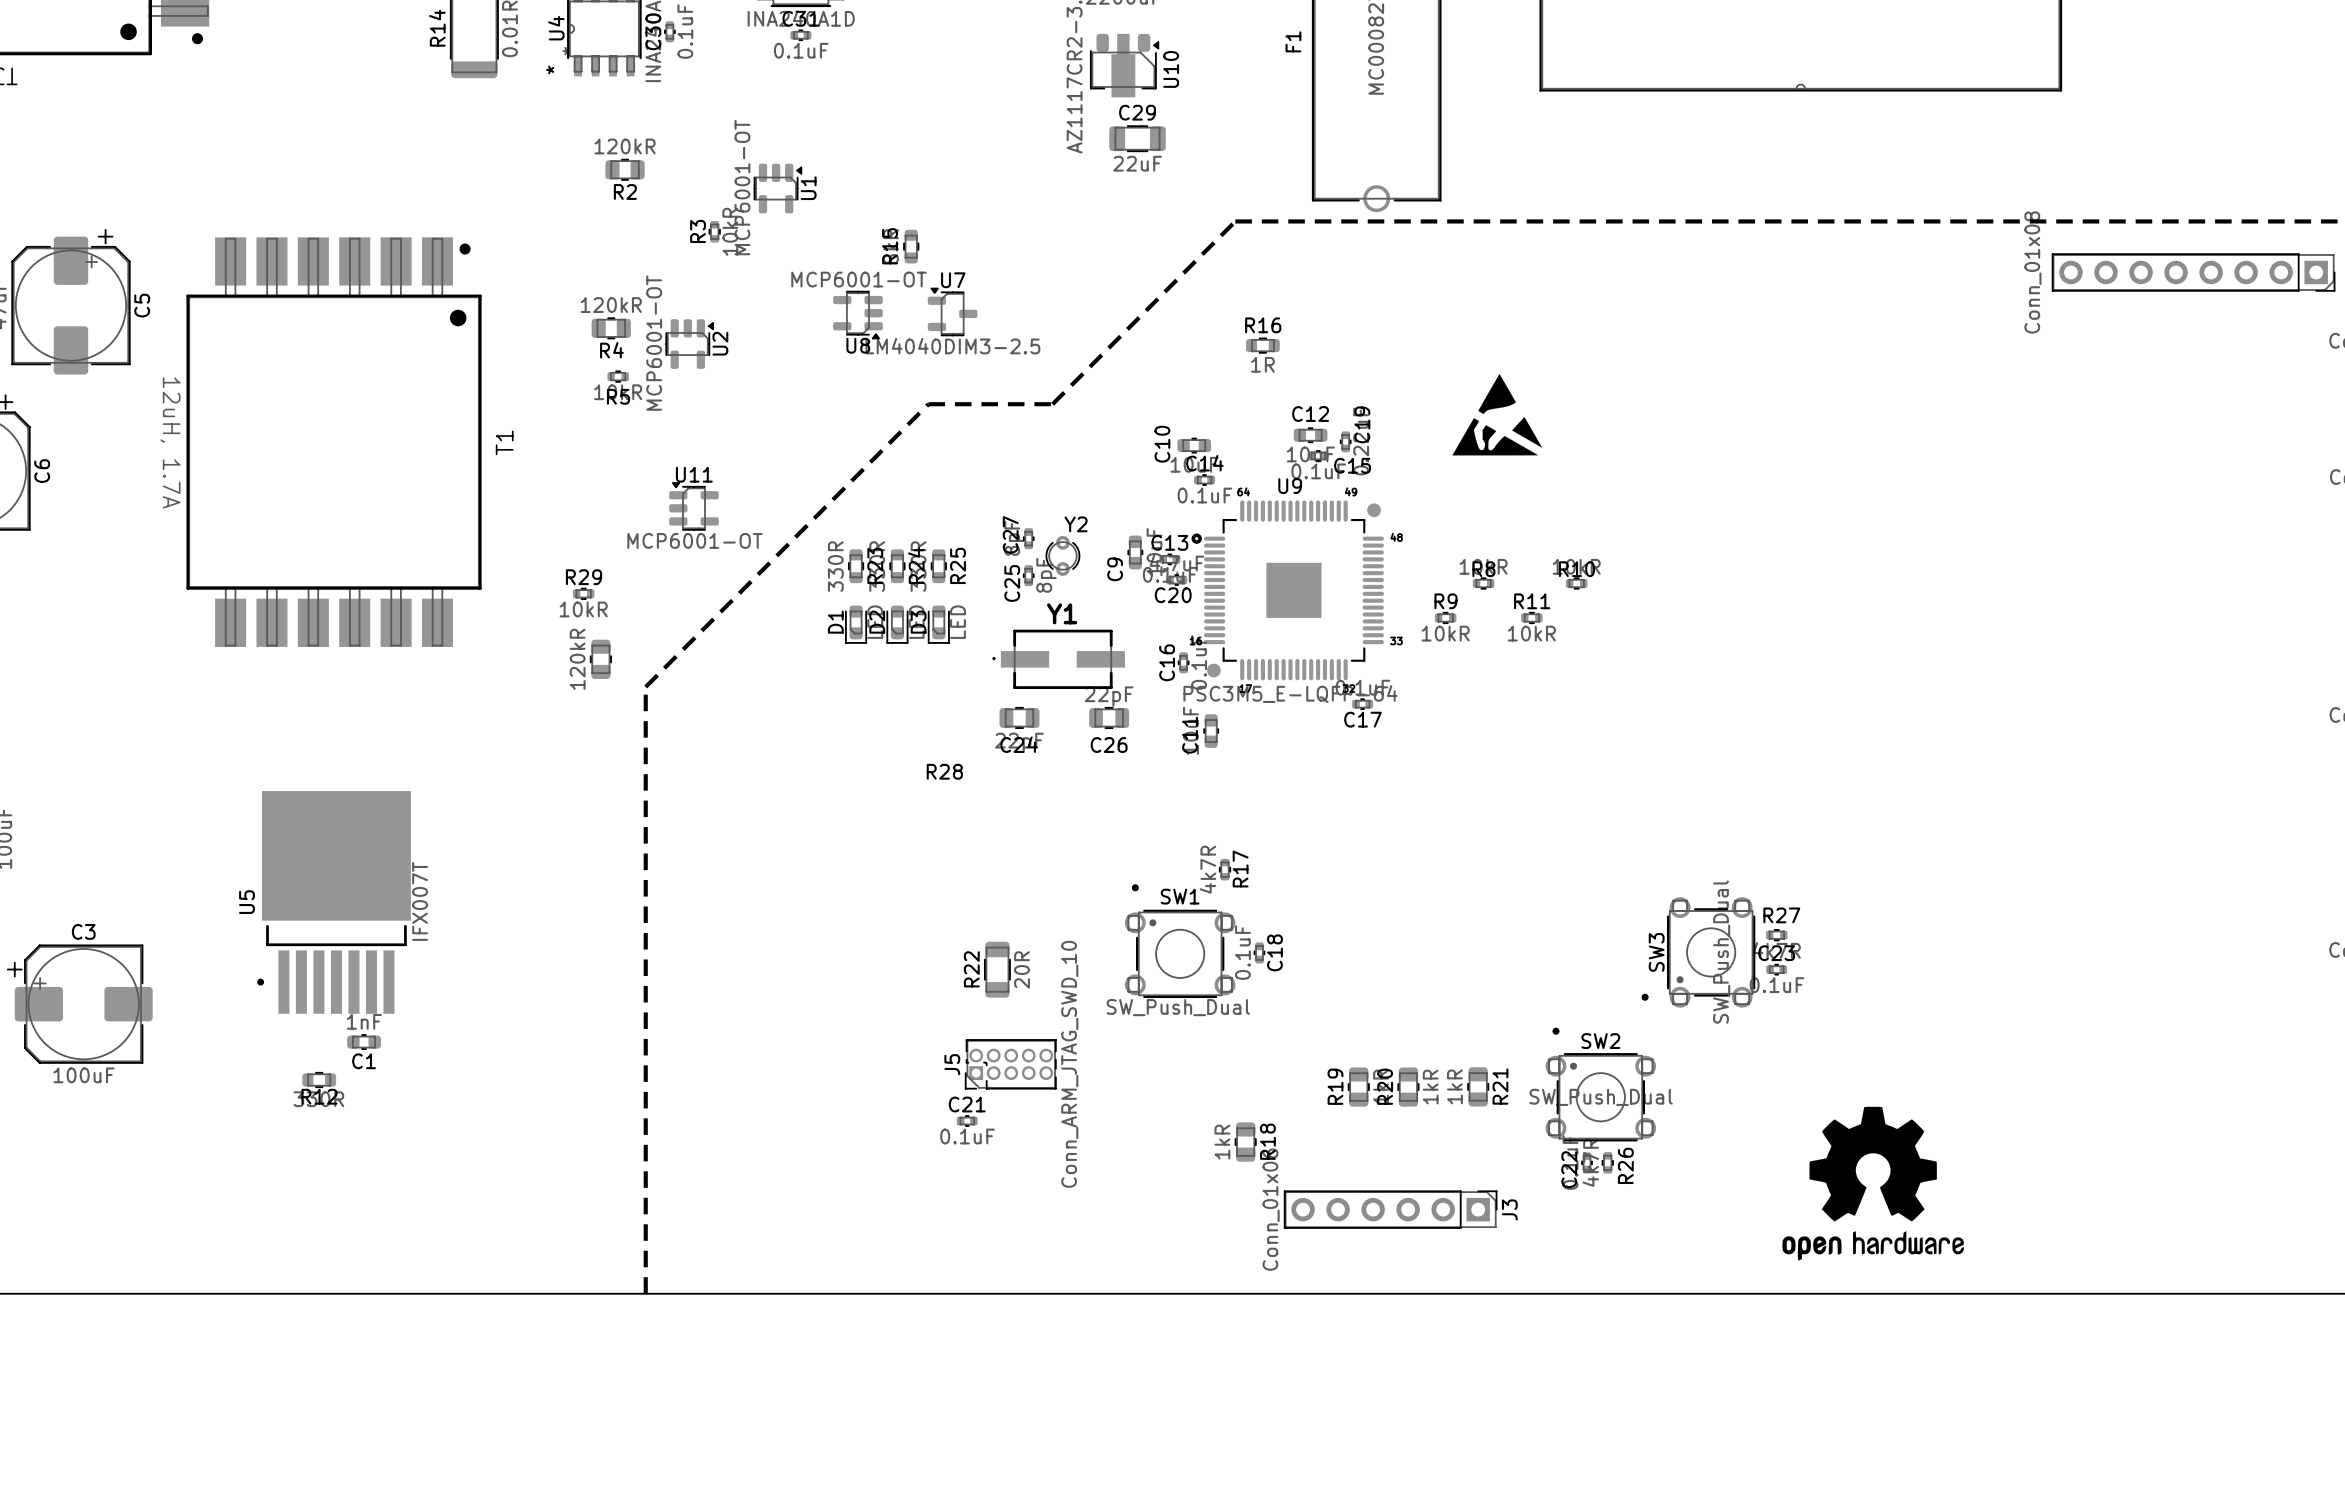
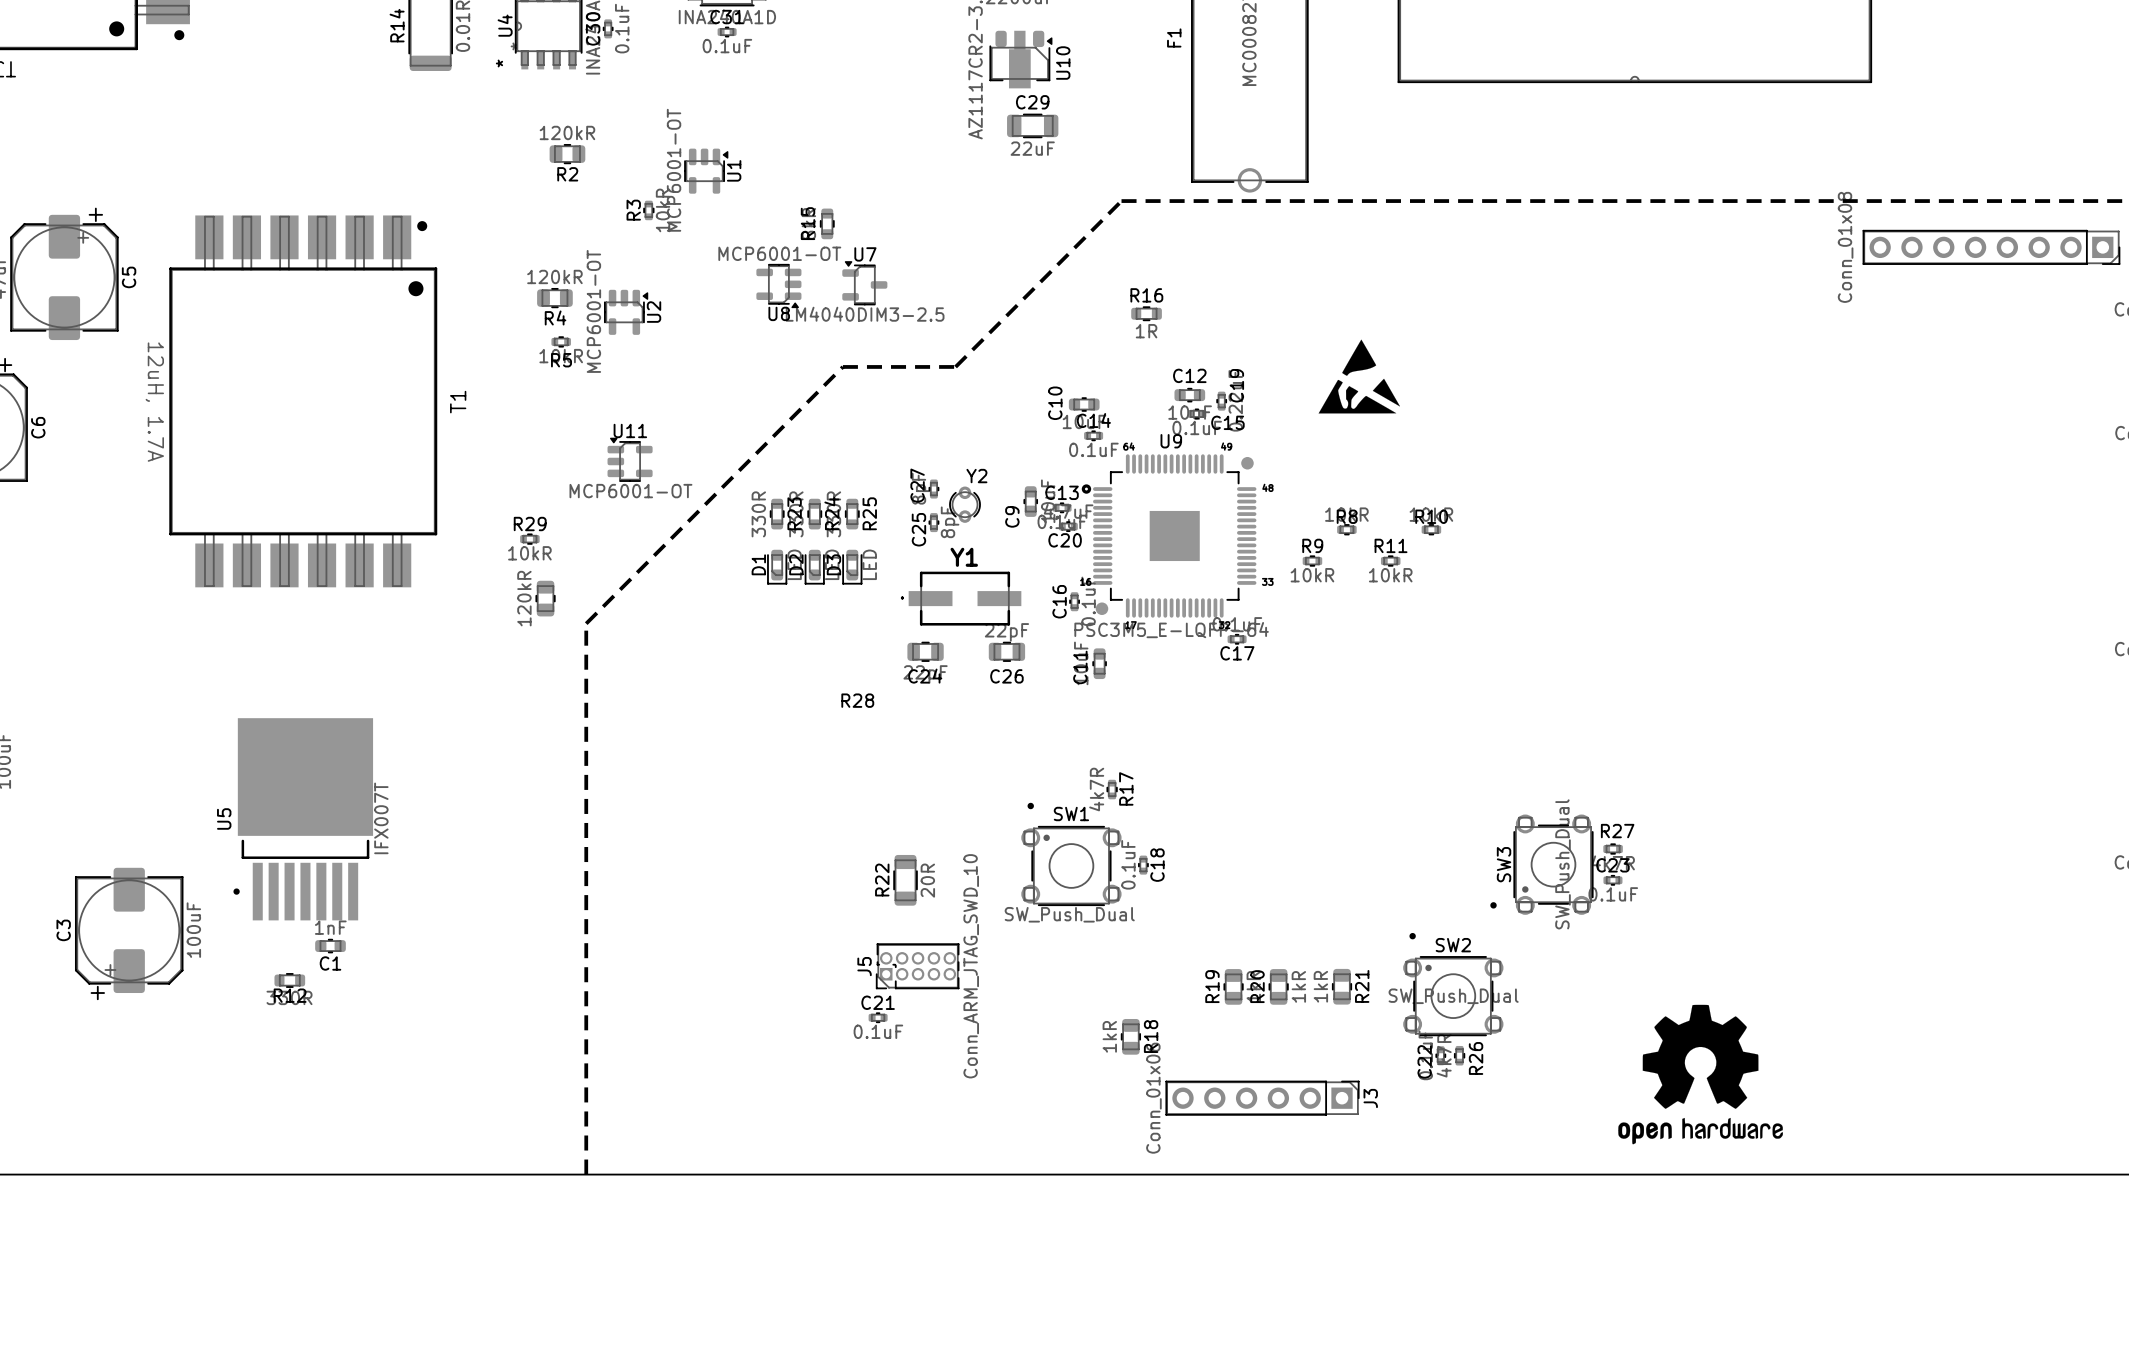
C3 rotation: 0° (79, 1004) -> 90° counterclockwise (129, 933)

